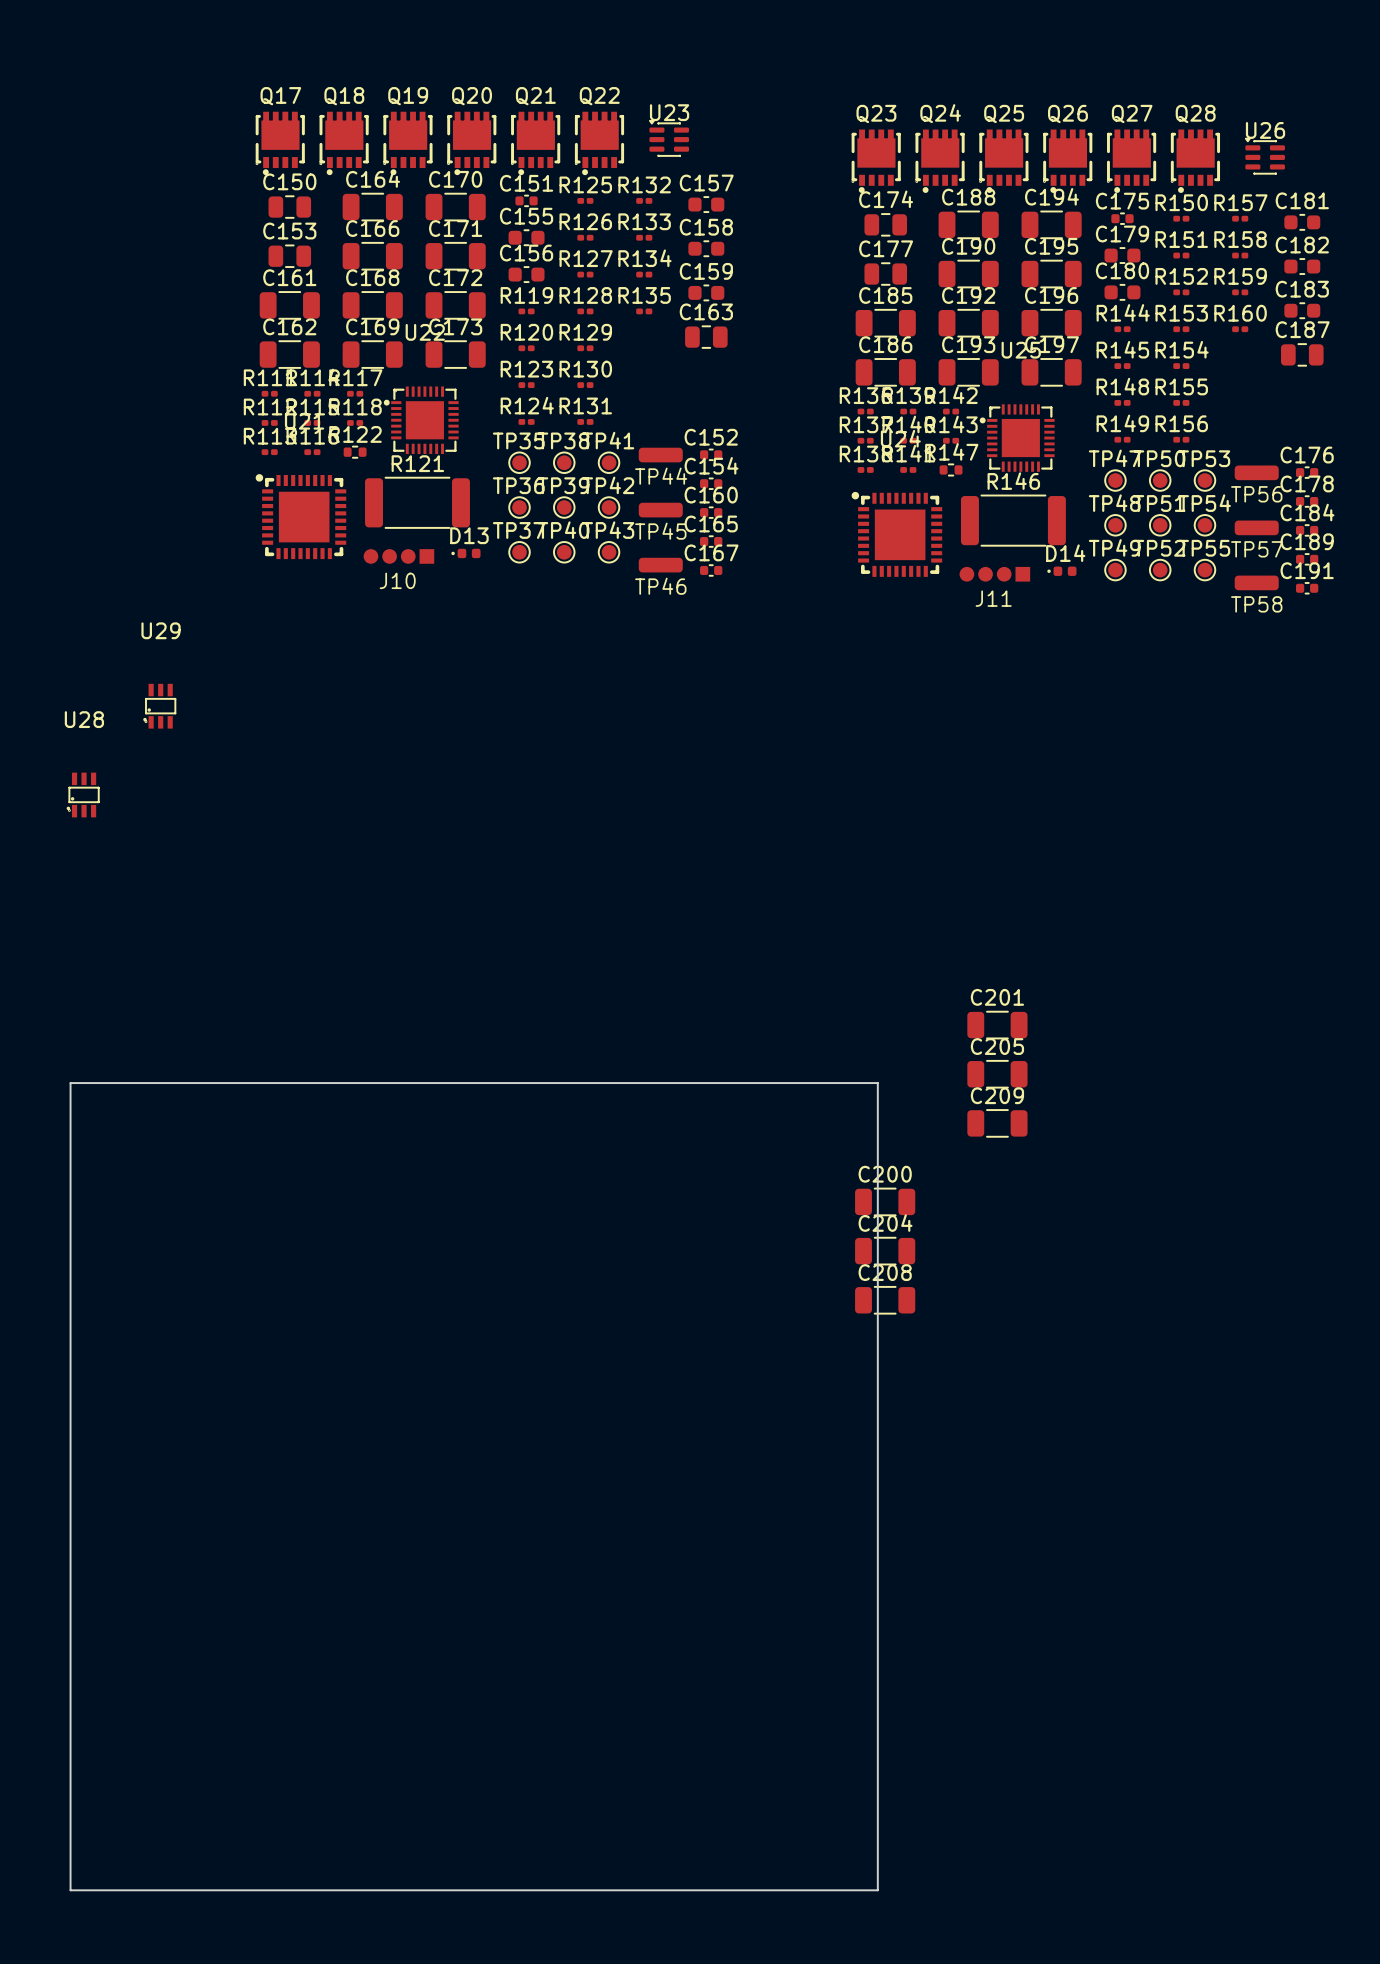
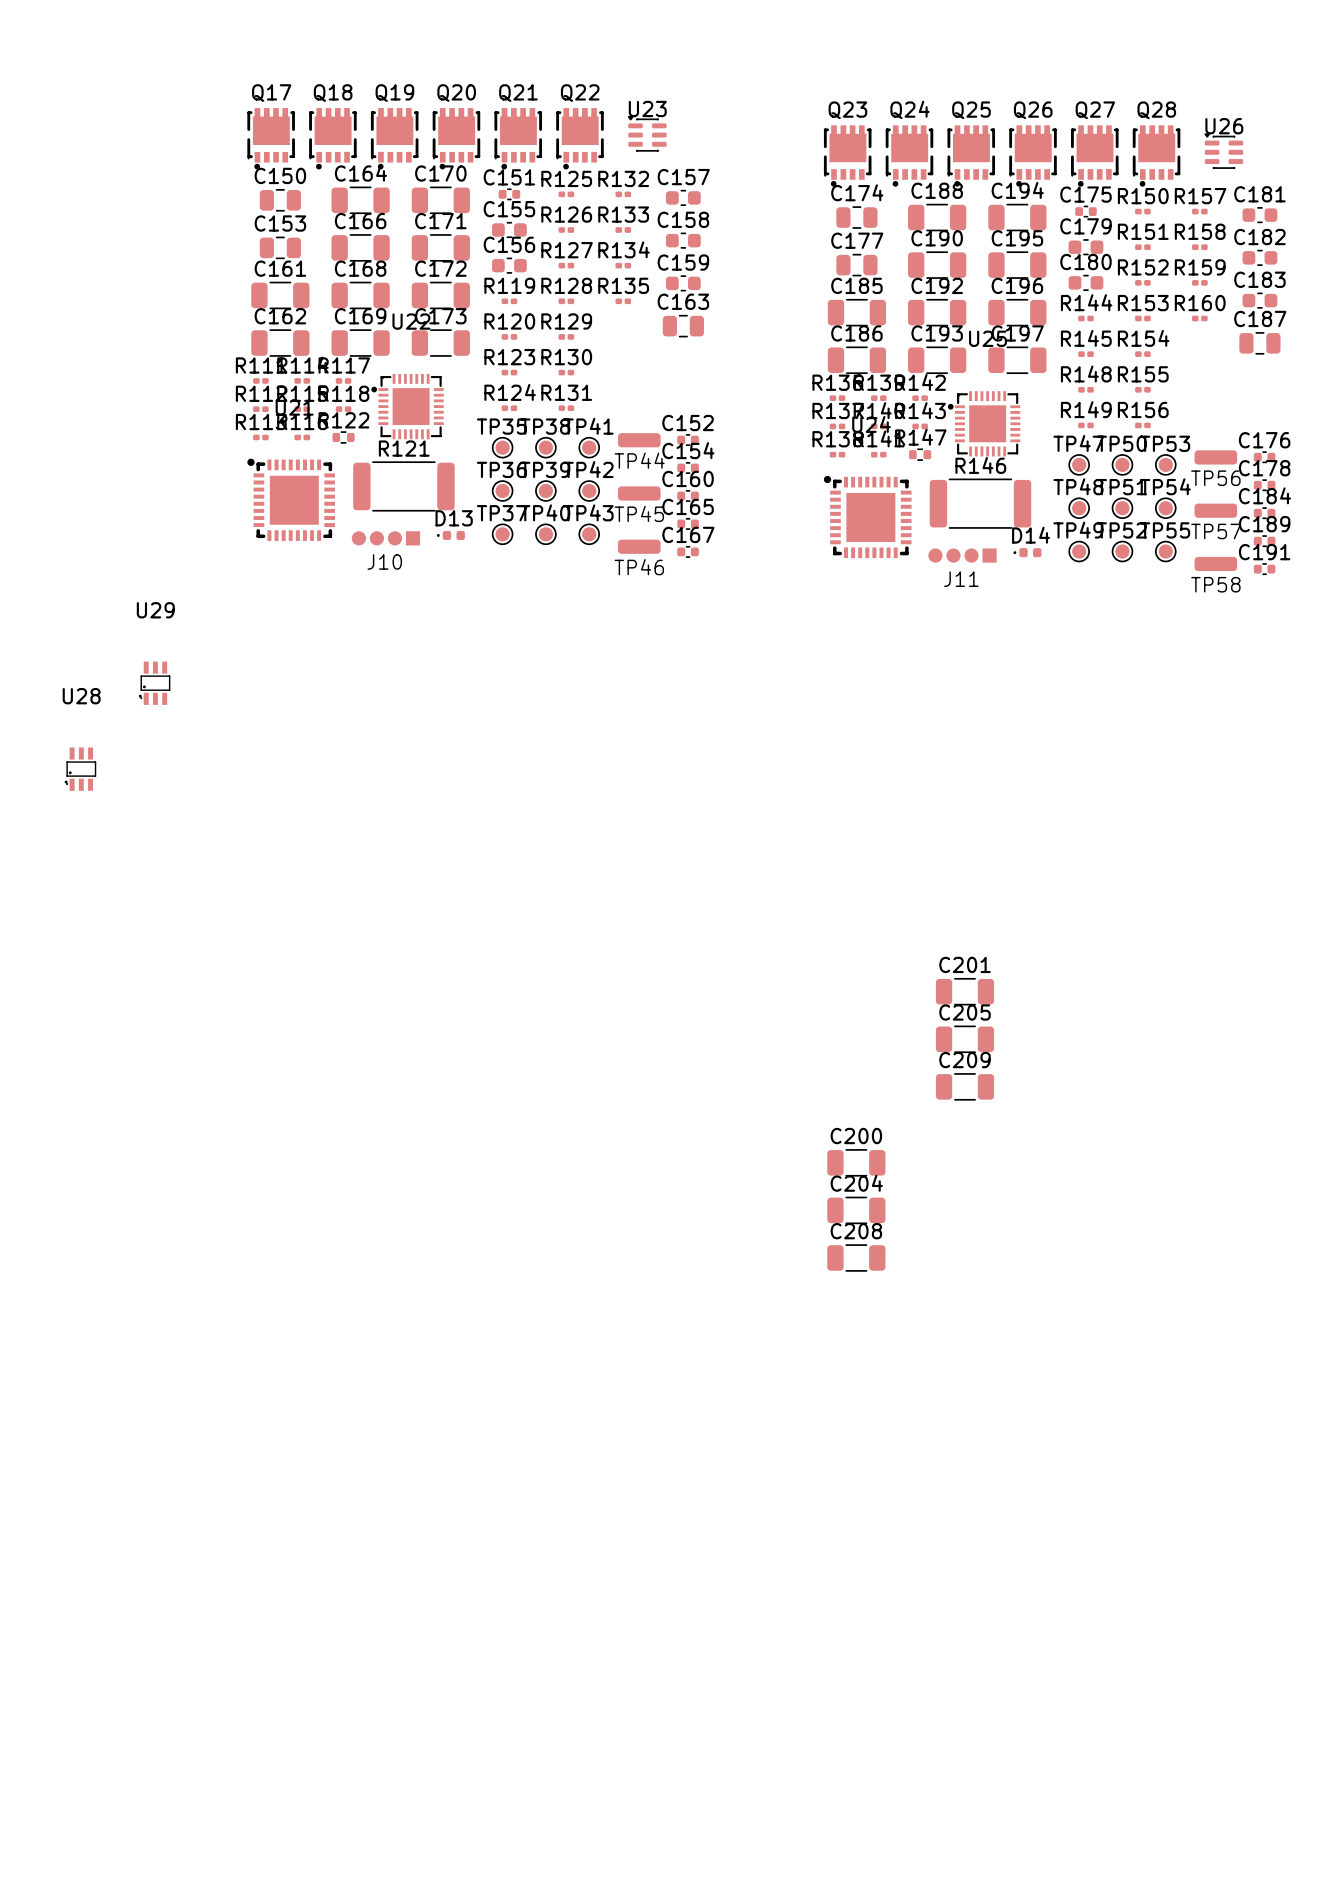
board edge: (70, 1083) (877, 1083) (877, 1890) (70, 1890) (70, 1083) -> none

